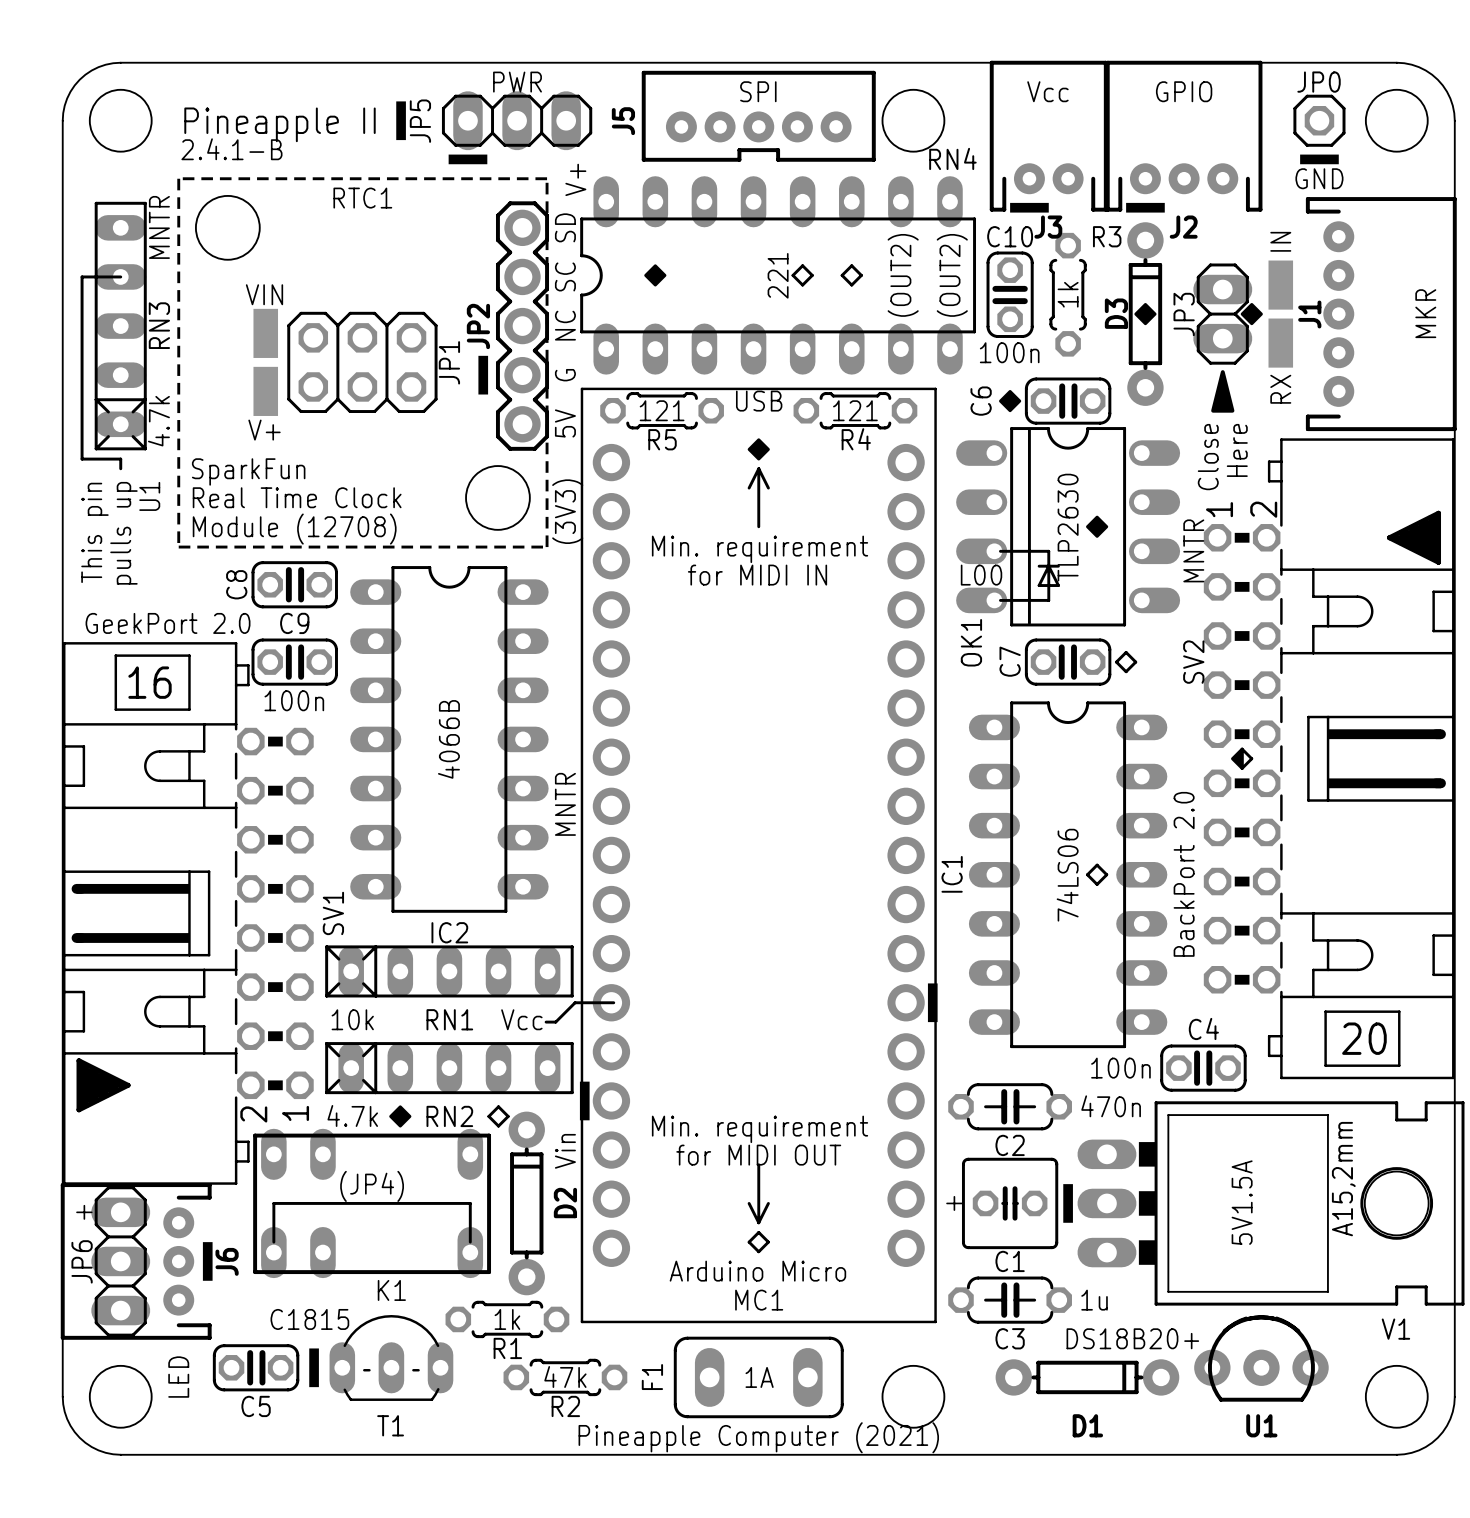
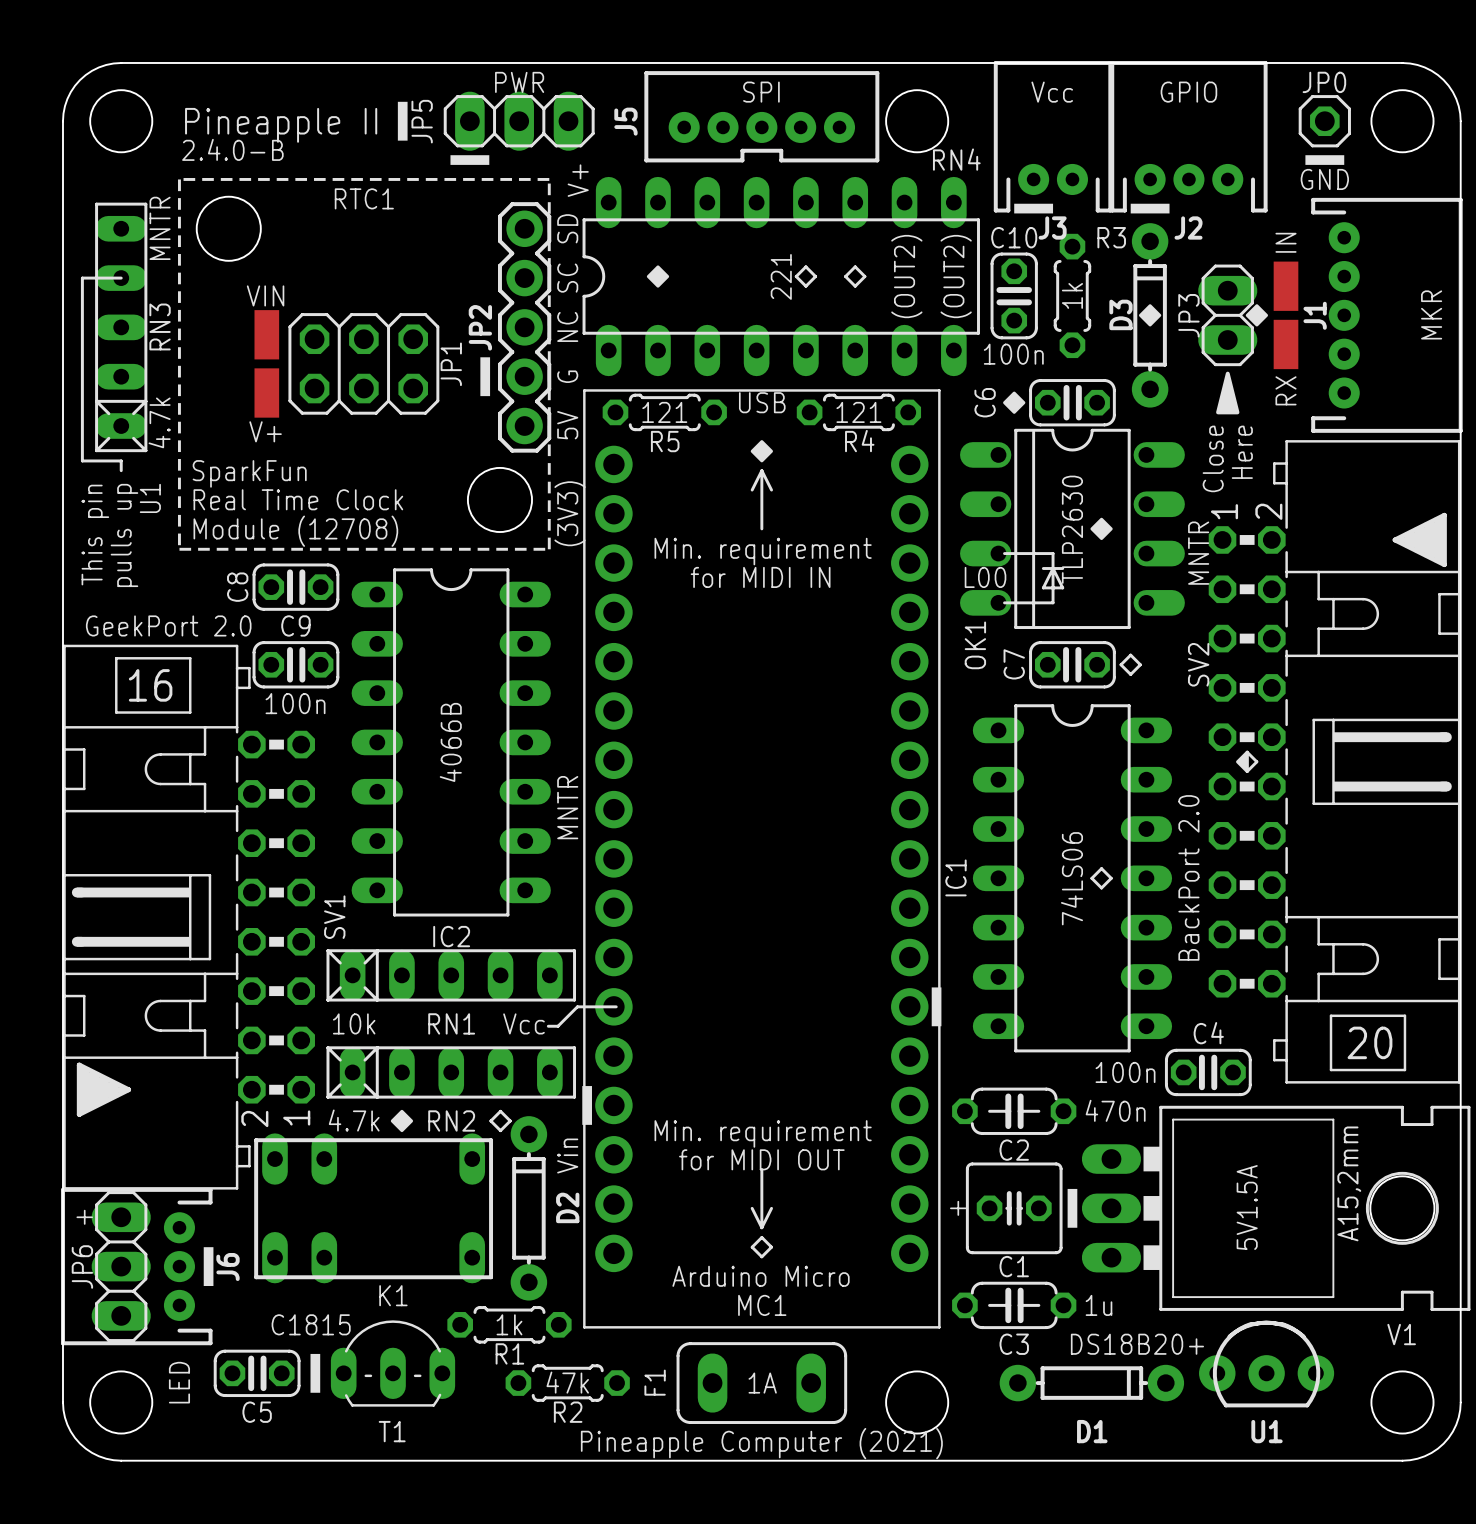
text: 2.4.1-B (231, 149) -> 2.4.0-B (232, 149)
text: (JP4) (372, 1186) -> none
line: (273, 1242) (273, 1203) (470, 1203) (470, 1242) -> none

